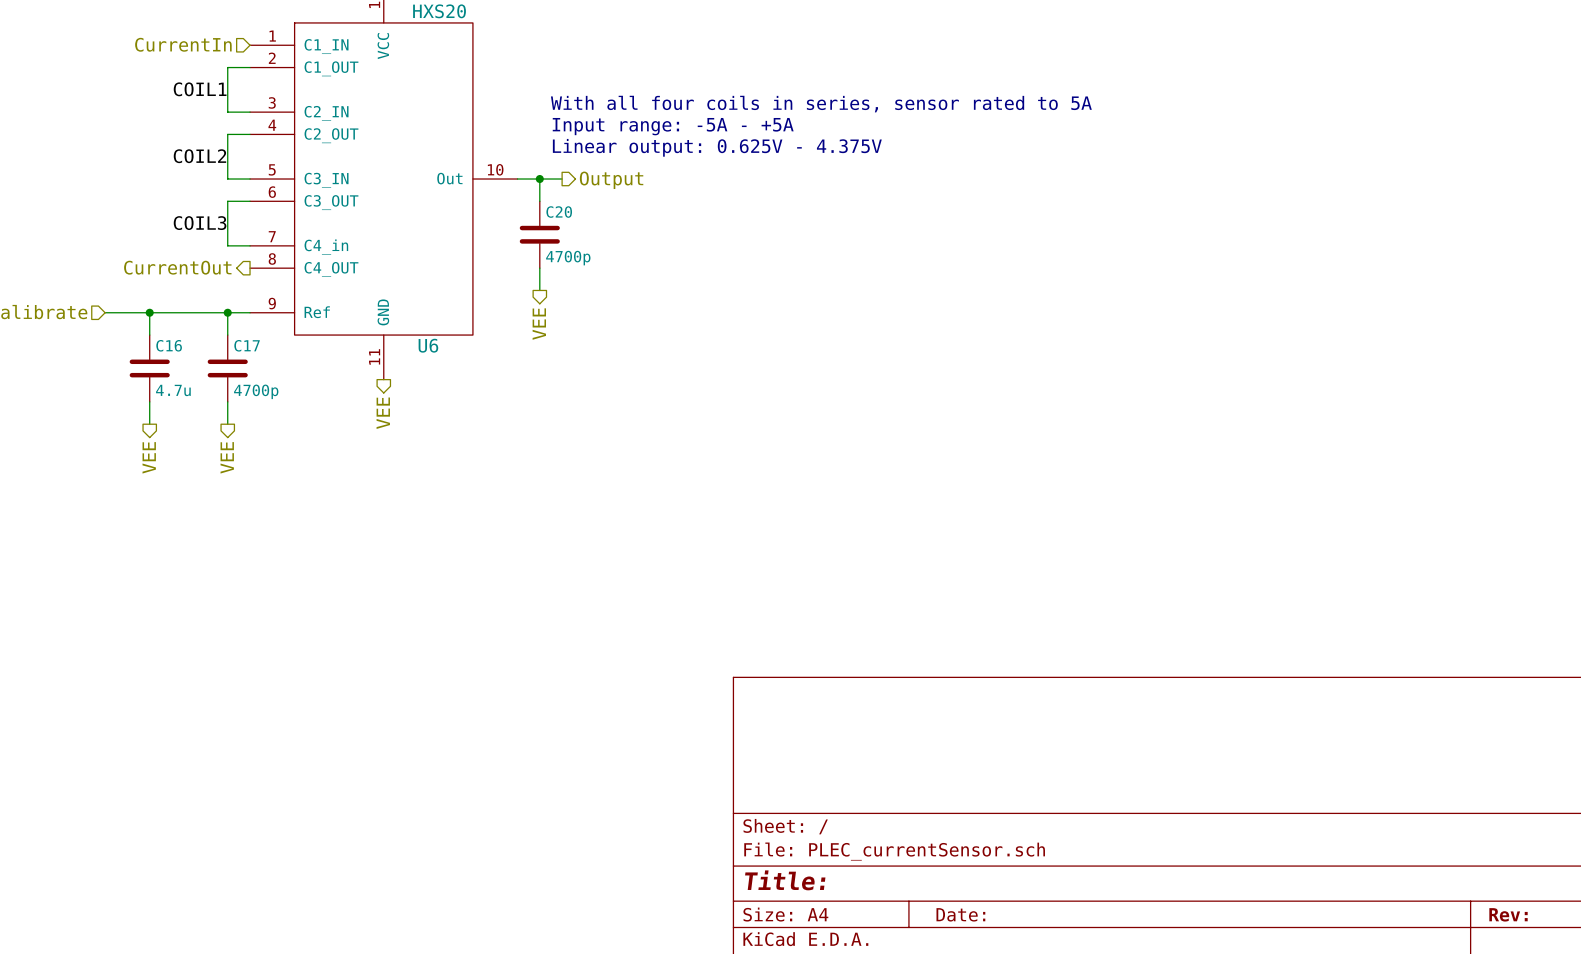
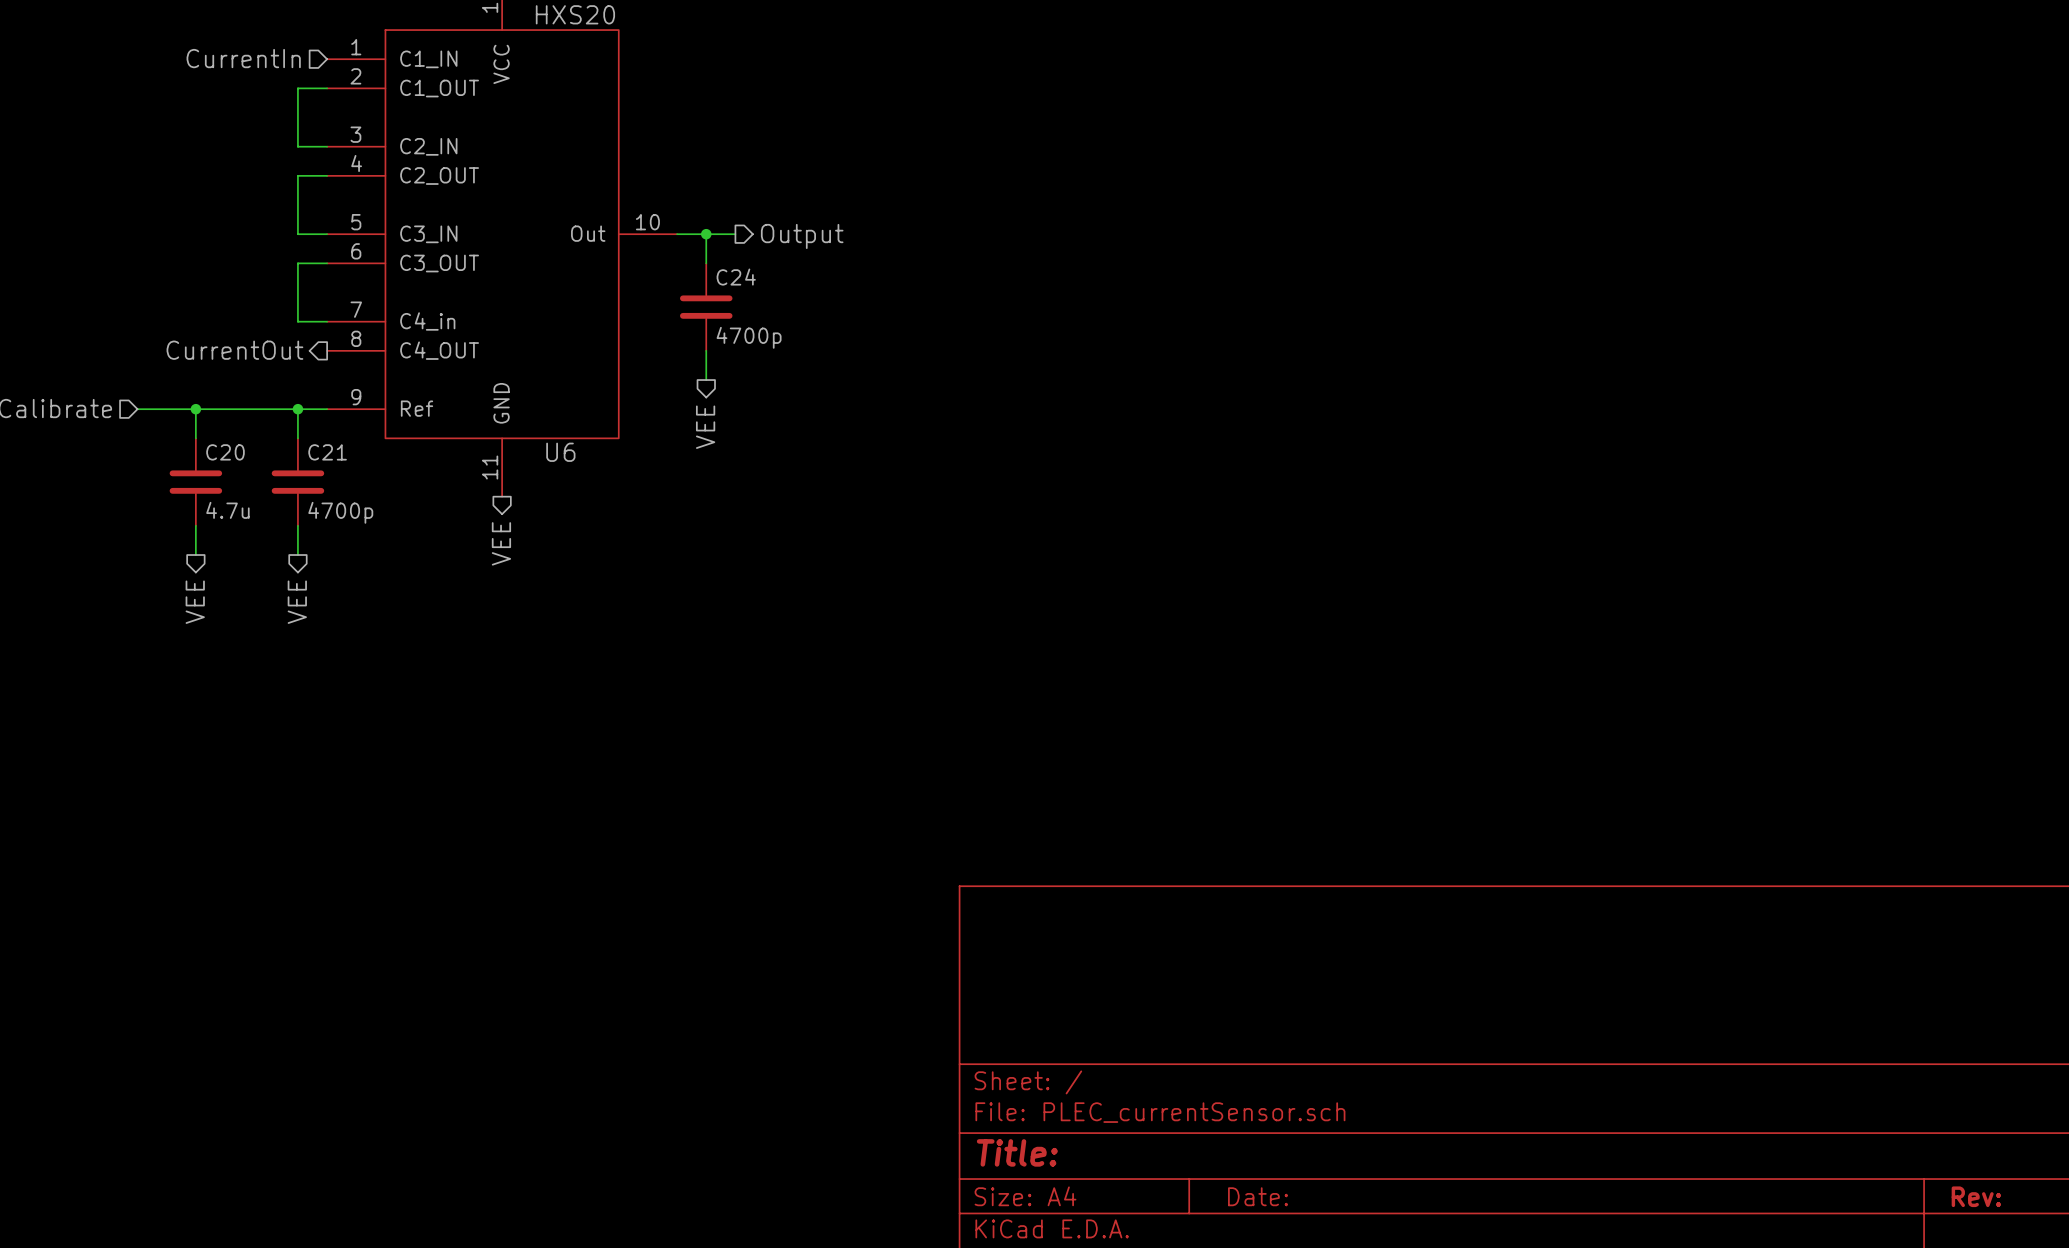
label: COIL1 (200, 89) -> none
text: With all four coils in series, sensor rated to 5A (821, 104) -> none
text: Input range: -5A - +5A (673, 126) -> none
text: Linear output: 0.625V - 4.375V (717, 147) -> none
label: COIL2 (199, 156) -> none
C20 name: C20 (559, 212) -> C24 (736, 277)
label: COIL3 (200, 223) -> none
C16 name: C16 (169, 345) -> C20 (225, 452)
C17 name: C17 (247, 345) -> C21 (327, 452)

